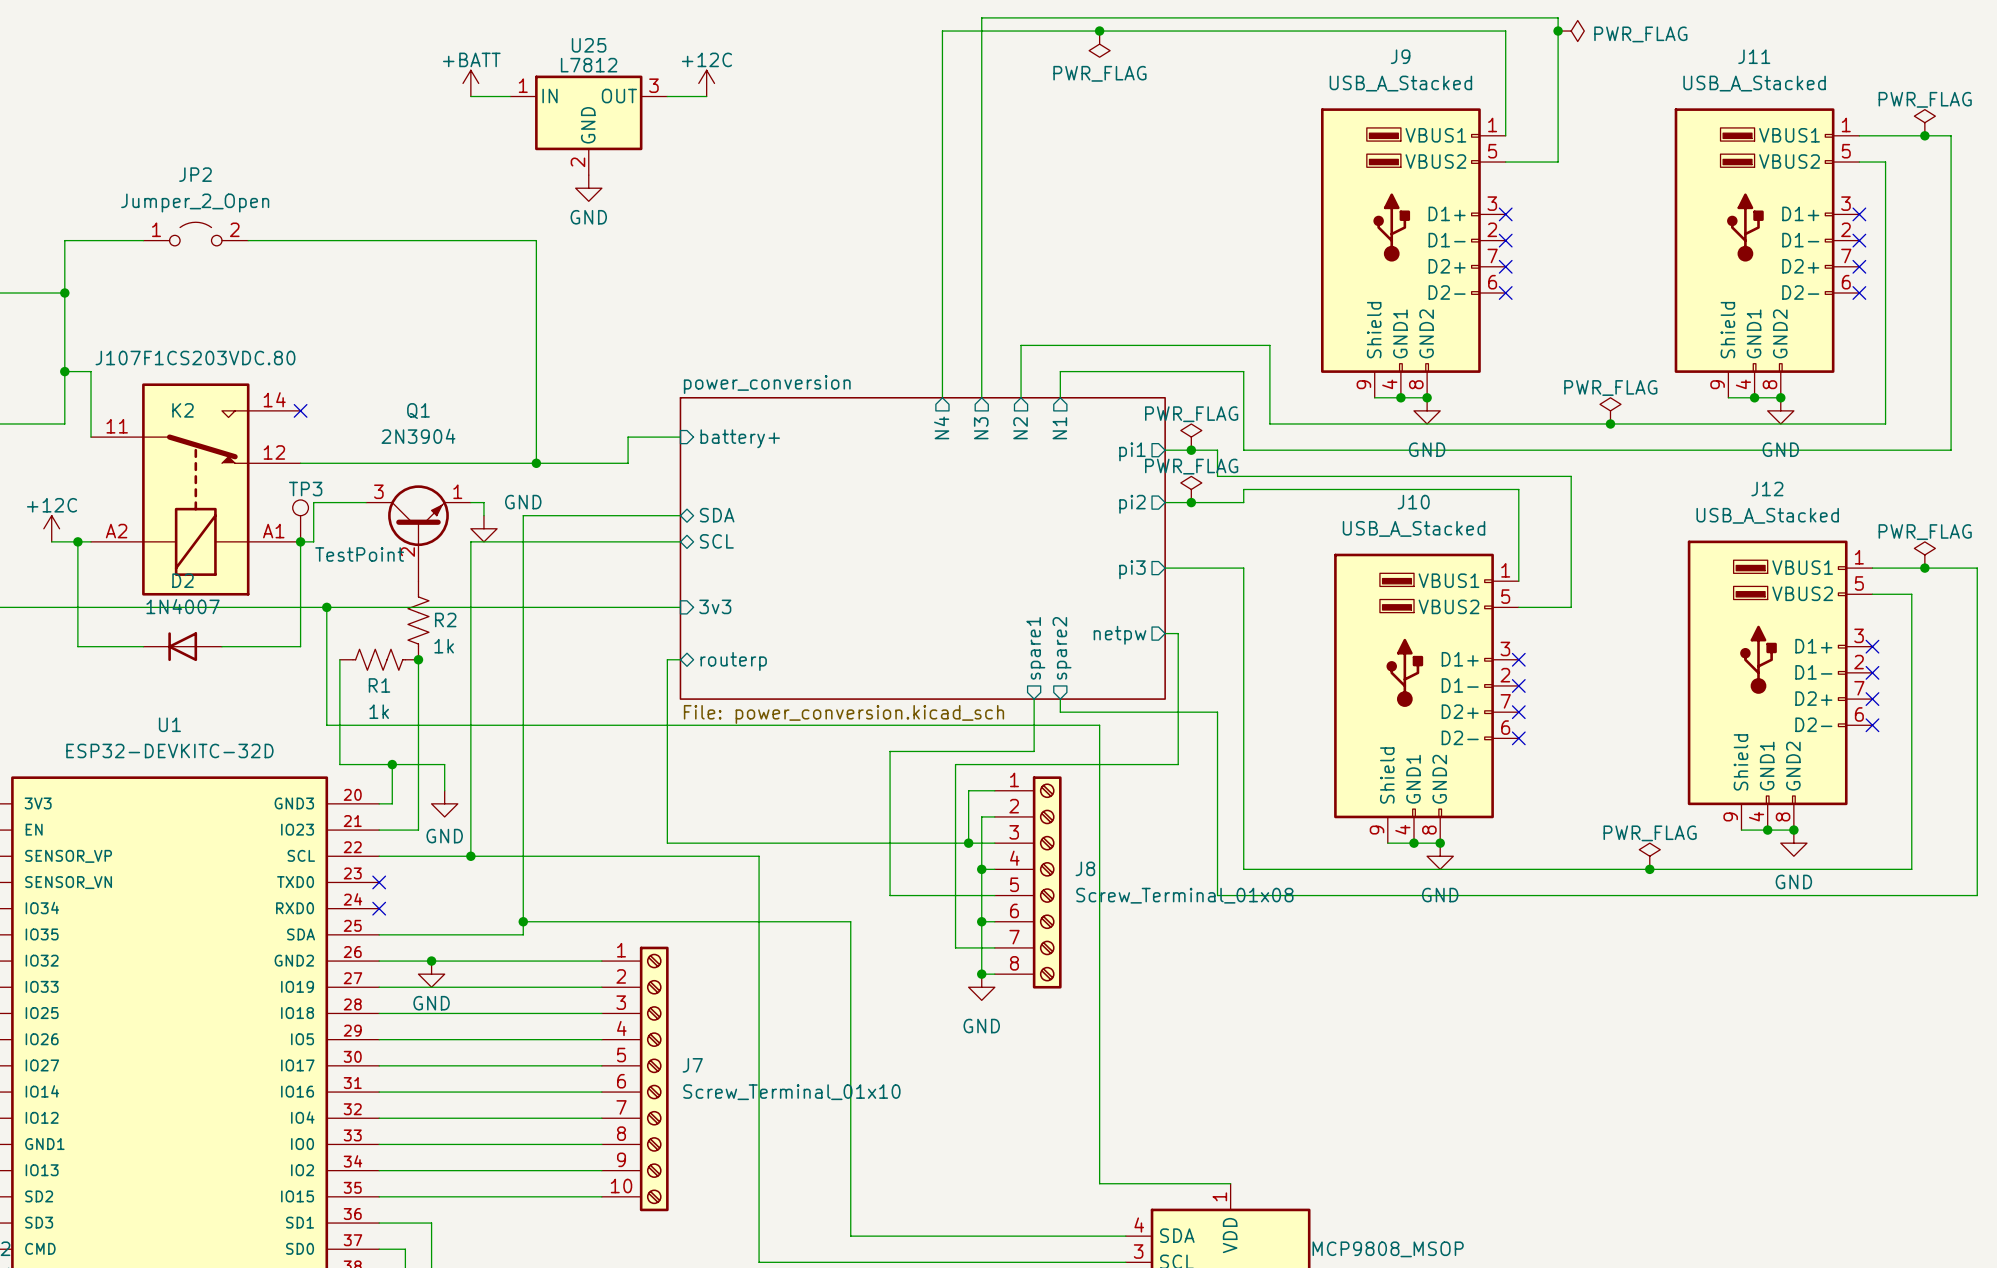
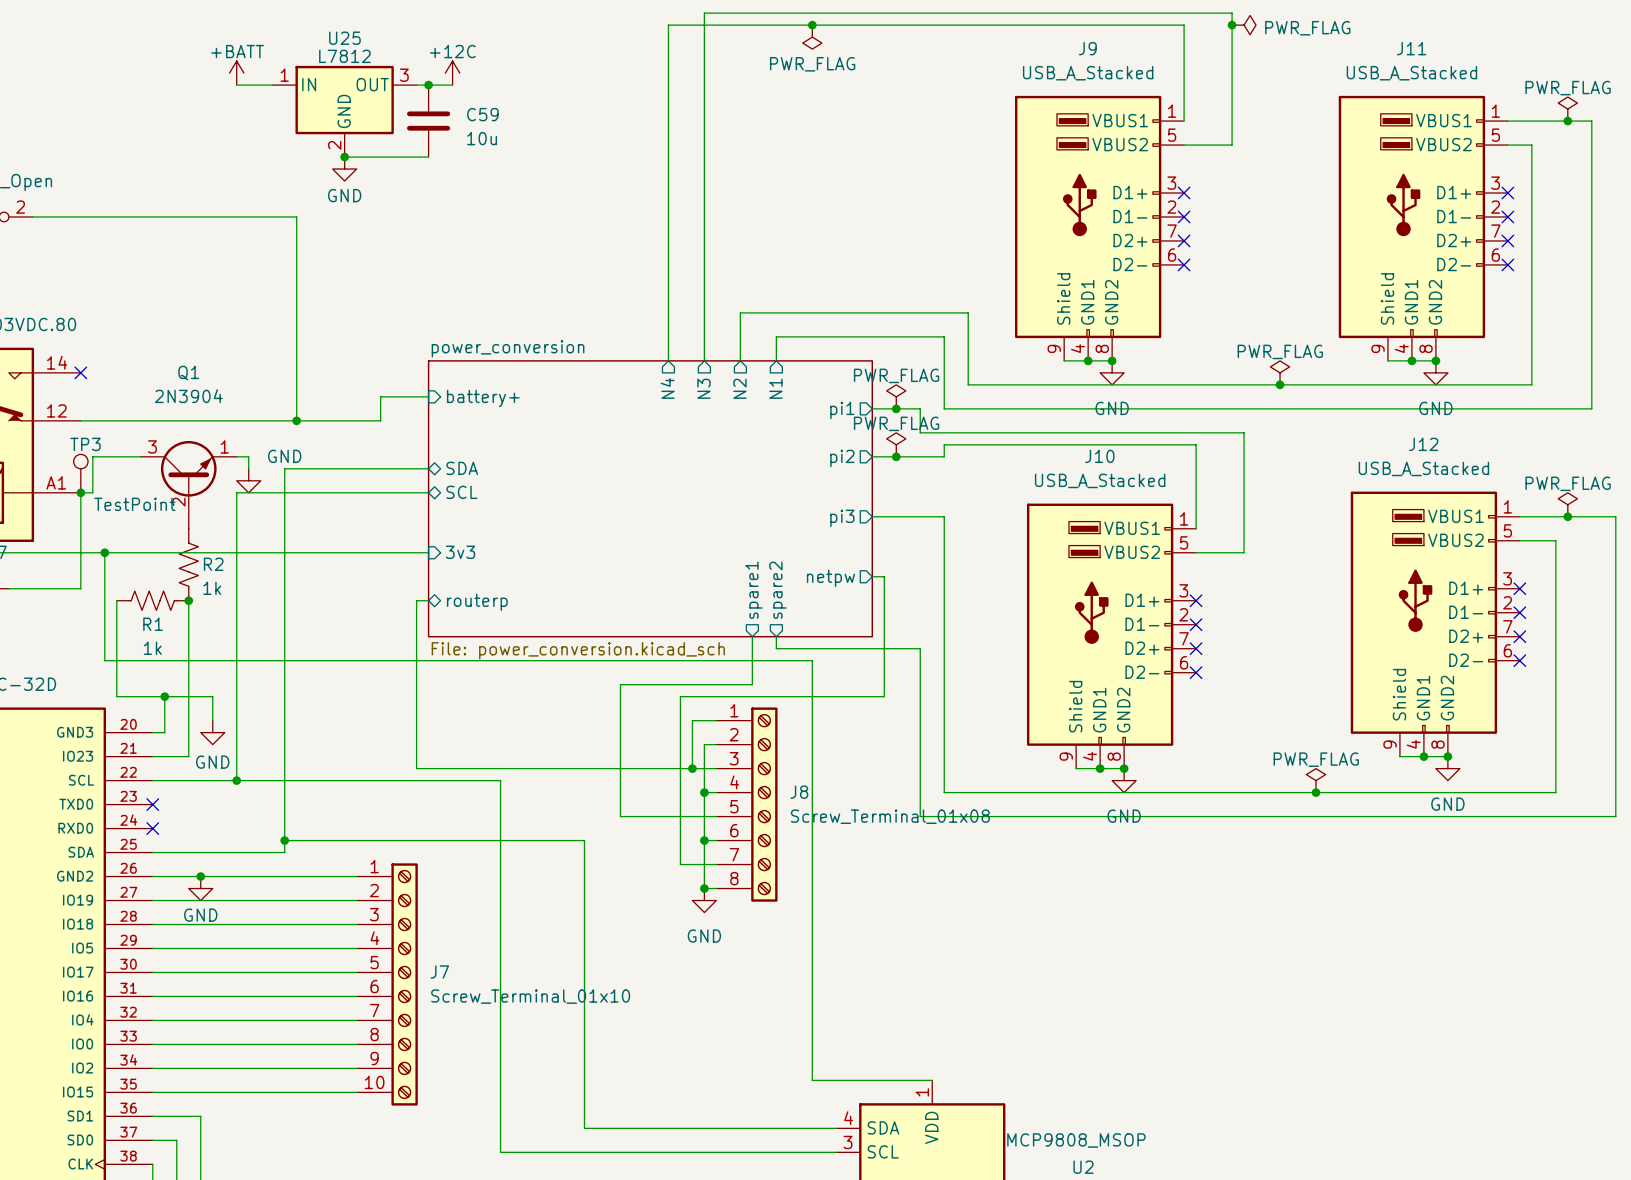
junction: none -> (428, 85)
C59: none -> 10u (428, 121)
wire: none -> (344, 157) (428, 157)
junction: none -> (344, 157)

